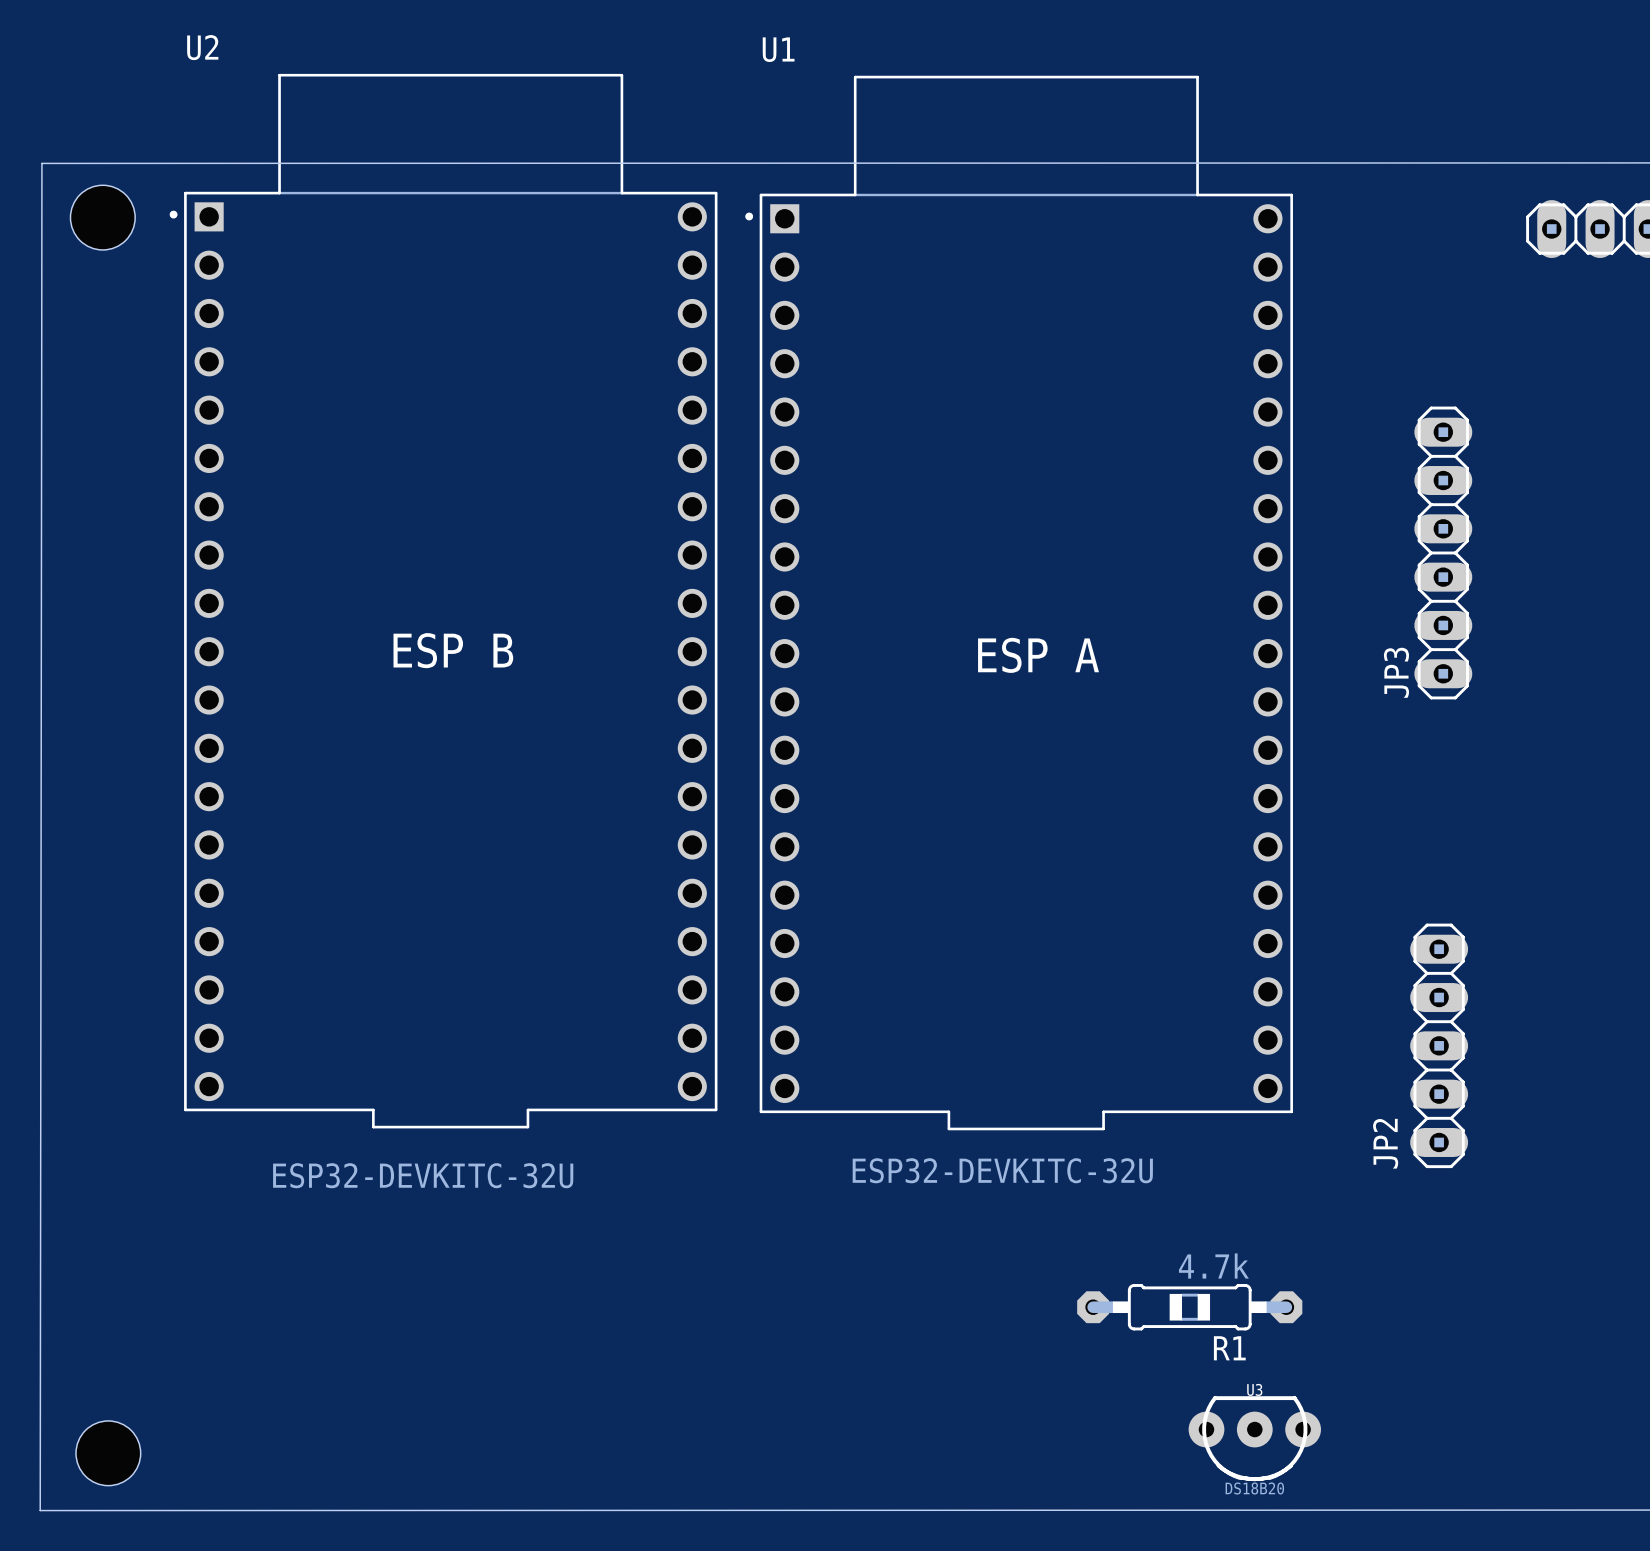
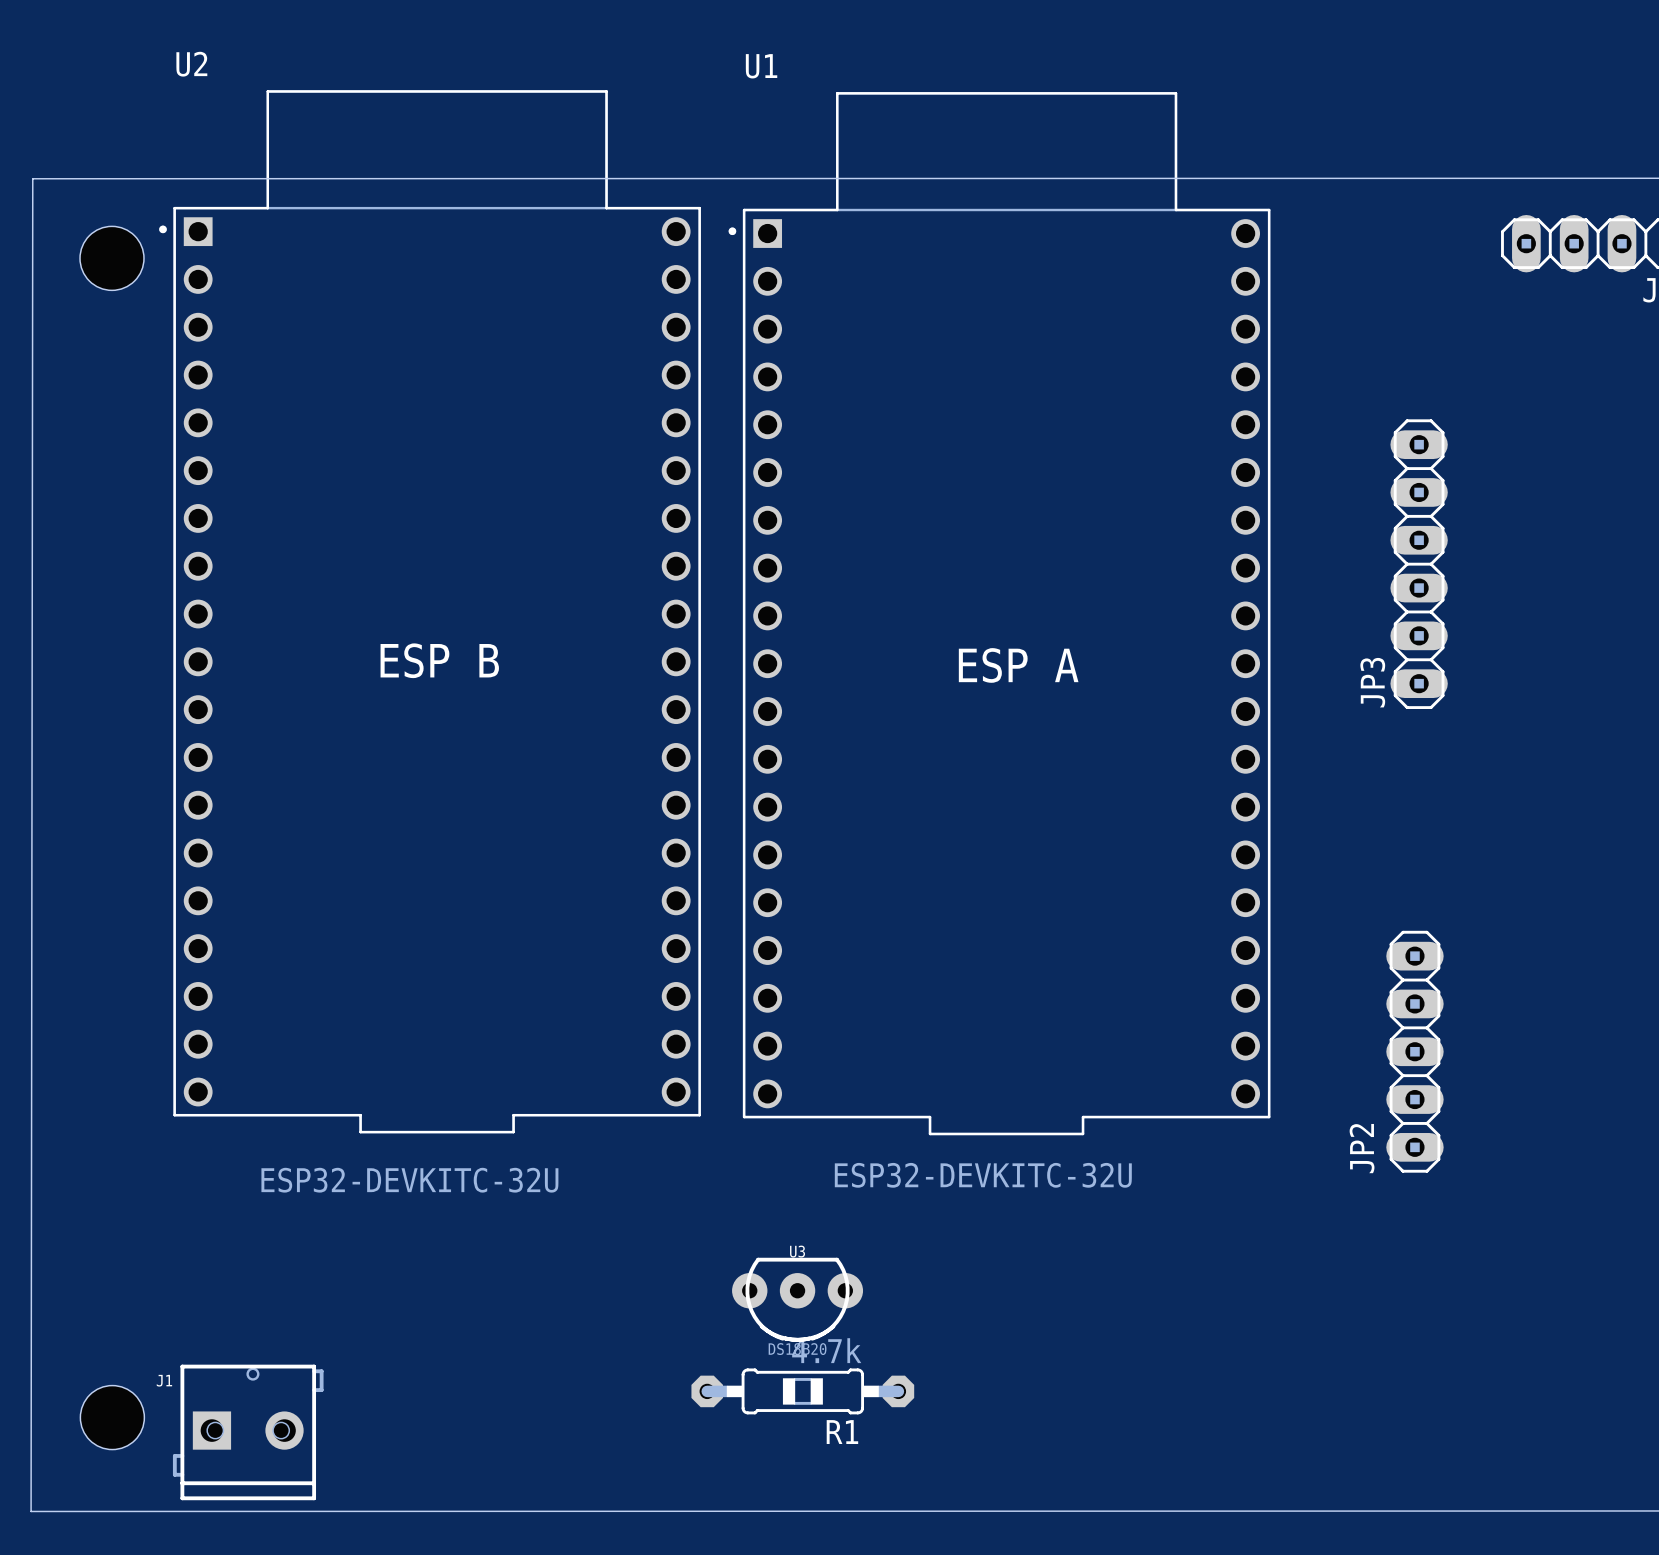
hole position: (102, 217) -> (111, 258)
R1 position: (1189, 1307) -> (802, 1391)
J1: none -> (248, 1432)
U3 position: (1254, 1438) -> (797, 1299)
hole position: (108, 1453) -> (112, 1417)

